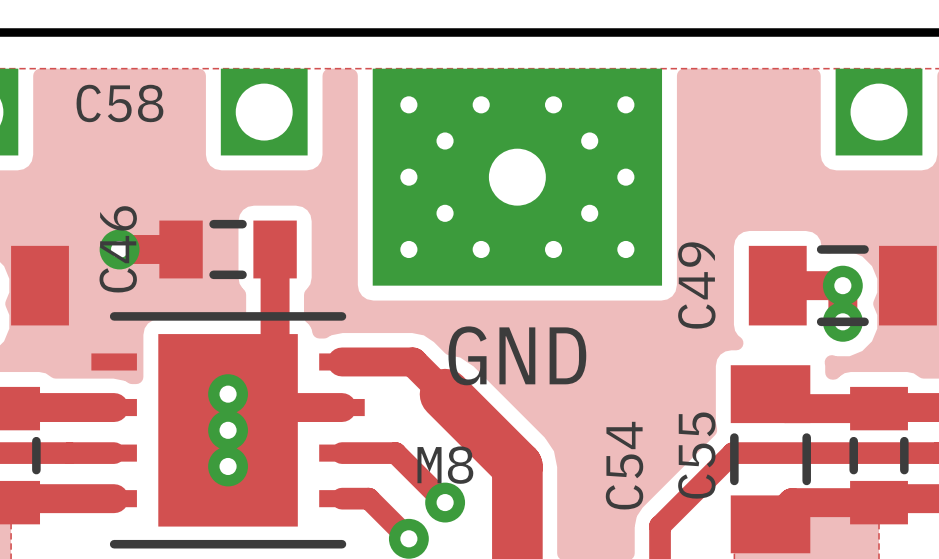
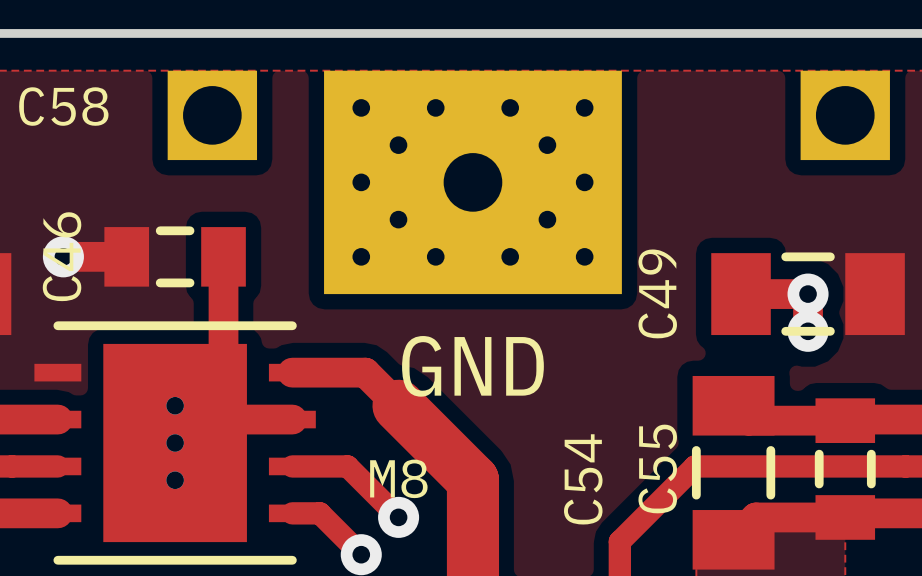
via size: [208, 374, 248, 415] -> [166, 396, 184, 415]
via size: [208, 410, 248, 451] -> [166, 434, 184, 452]
via size: [208, 446, 248, 487] -> [166, 471, 184, 490]

